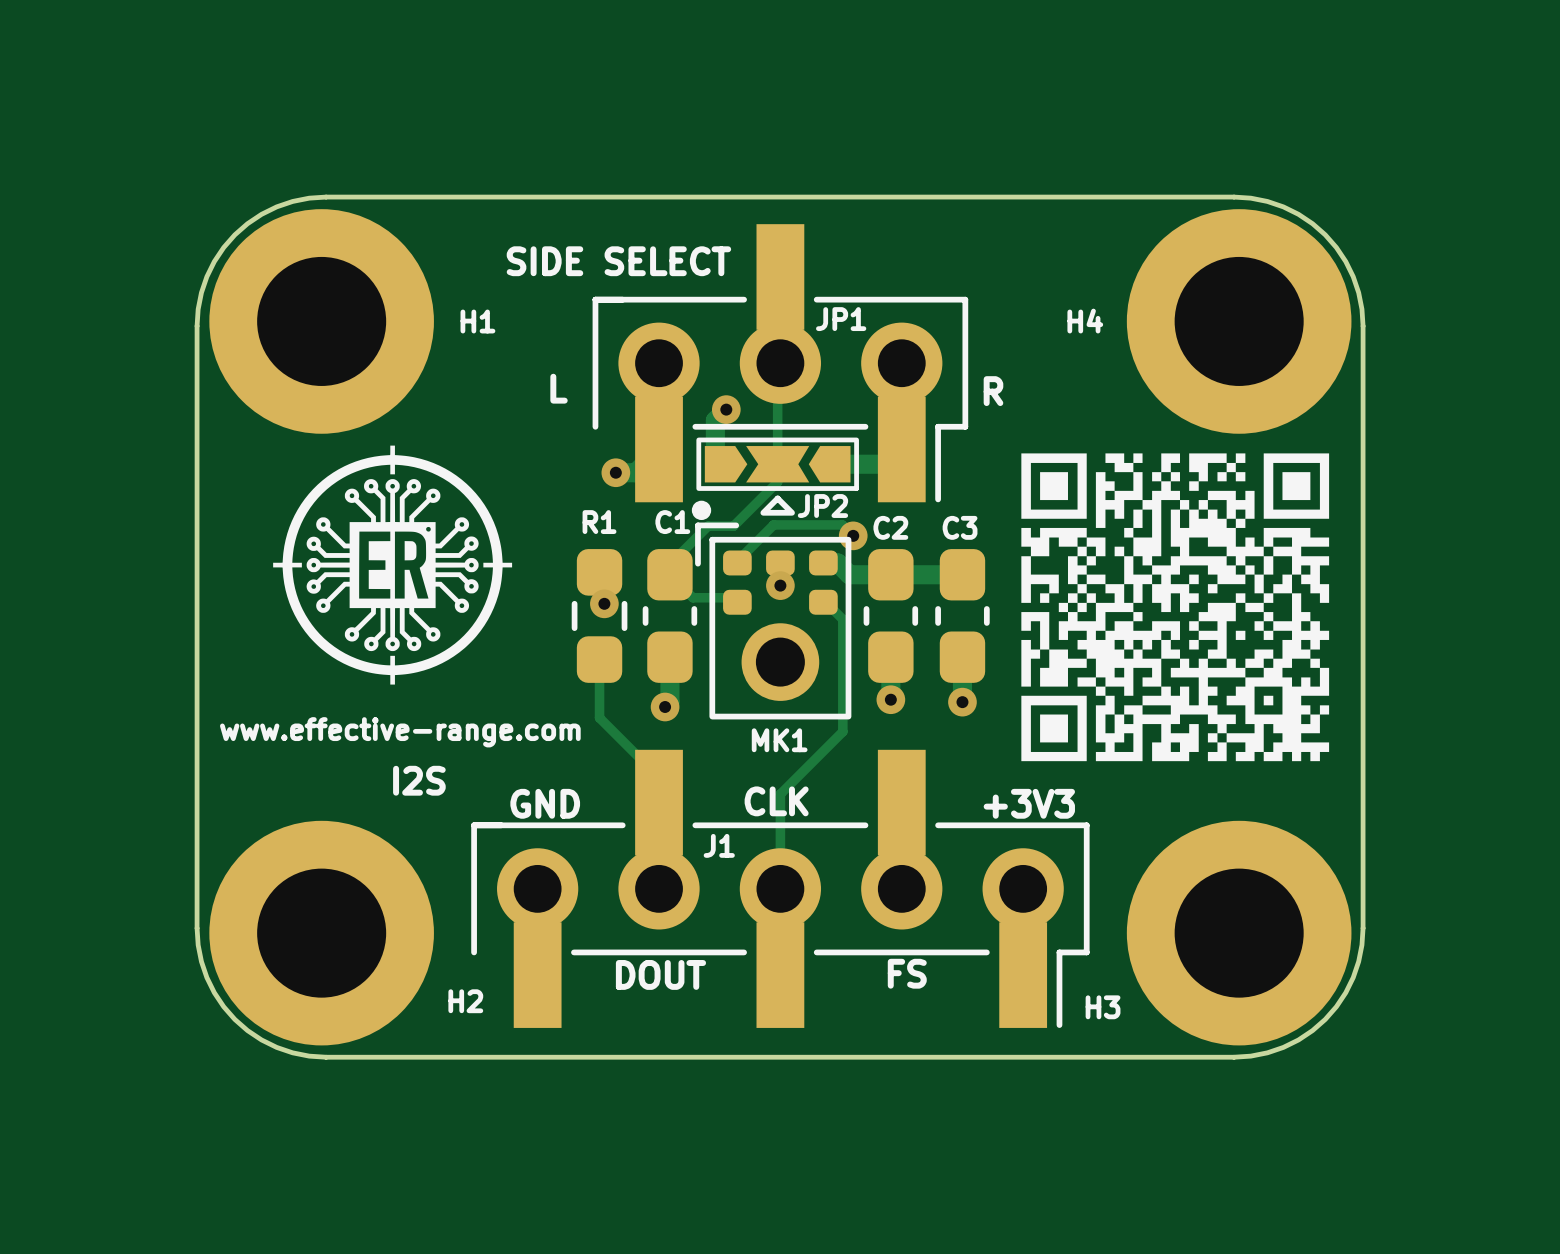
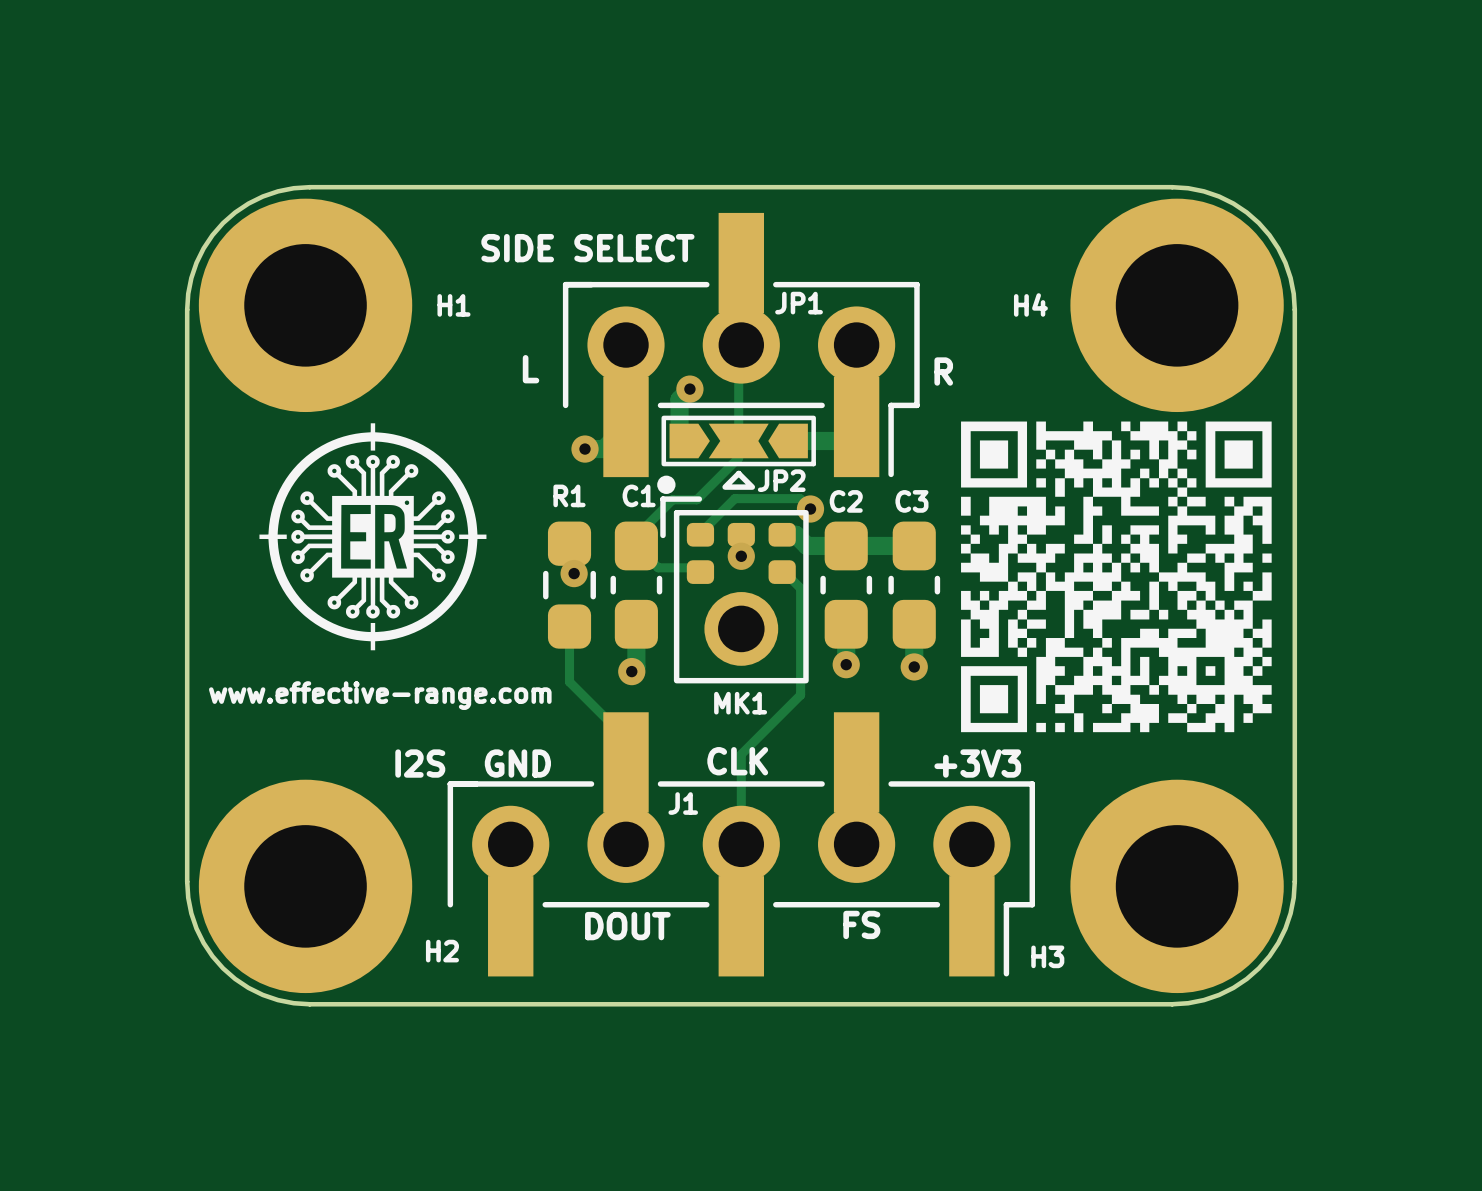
drawing shape: [1021, 453, 1330, 762] -> [961, 421, 1272, 733]
text position: I2S (419, 780) -> I2S (420, 763)

